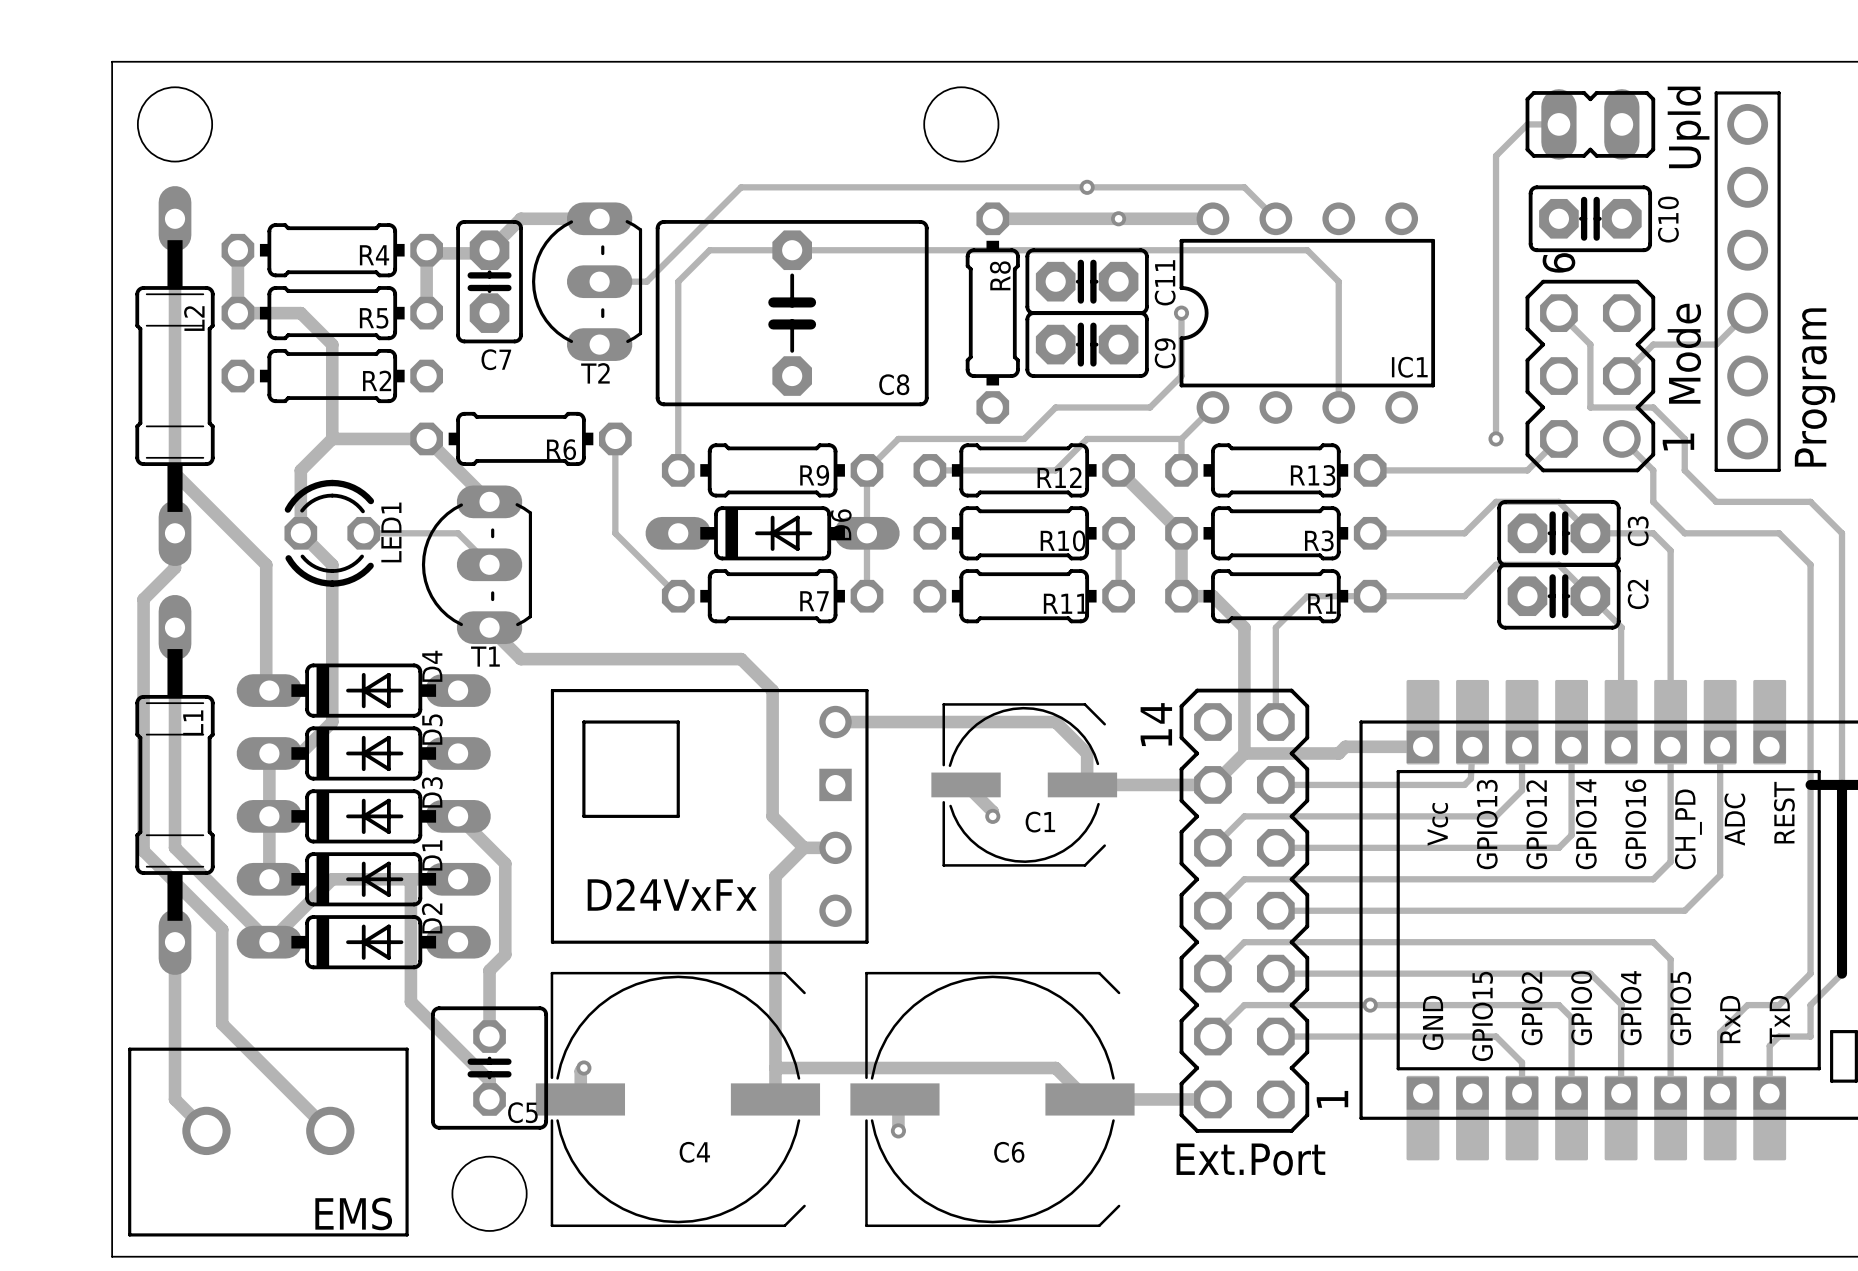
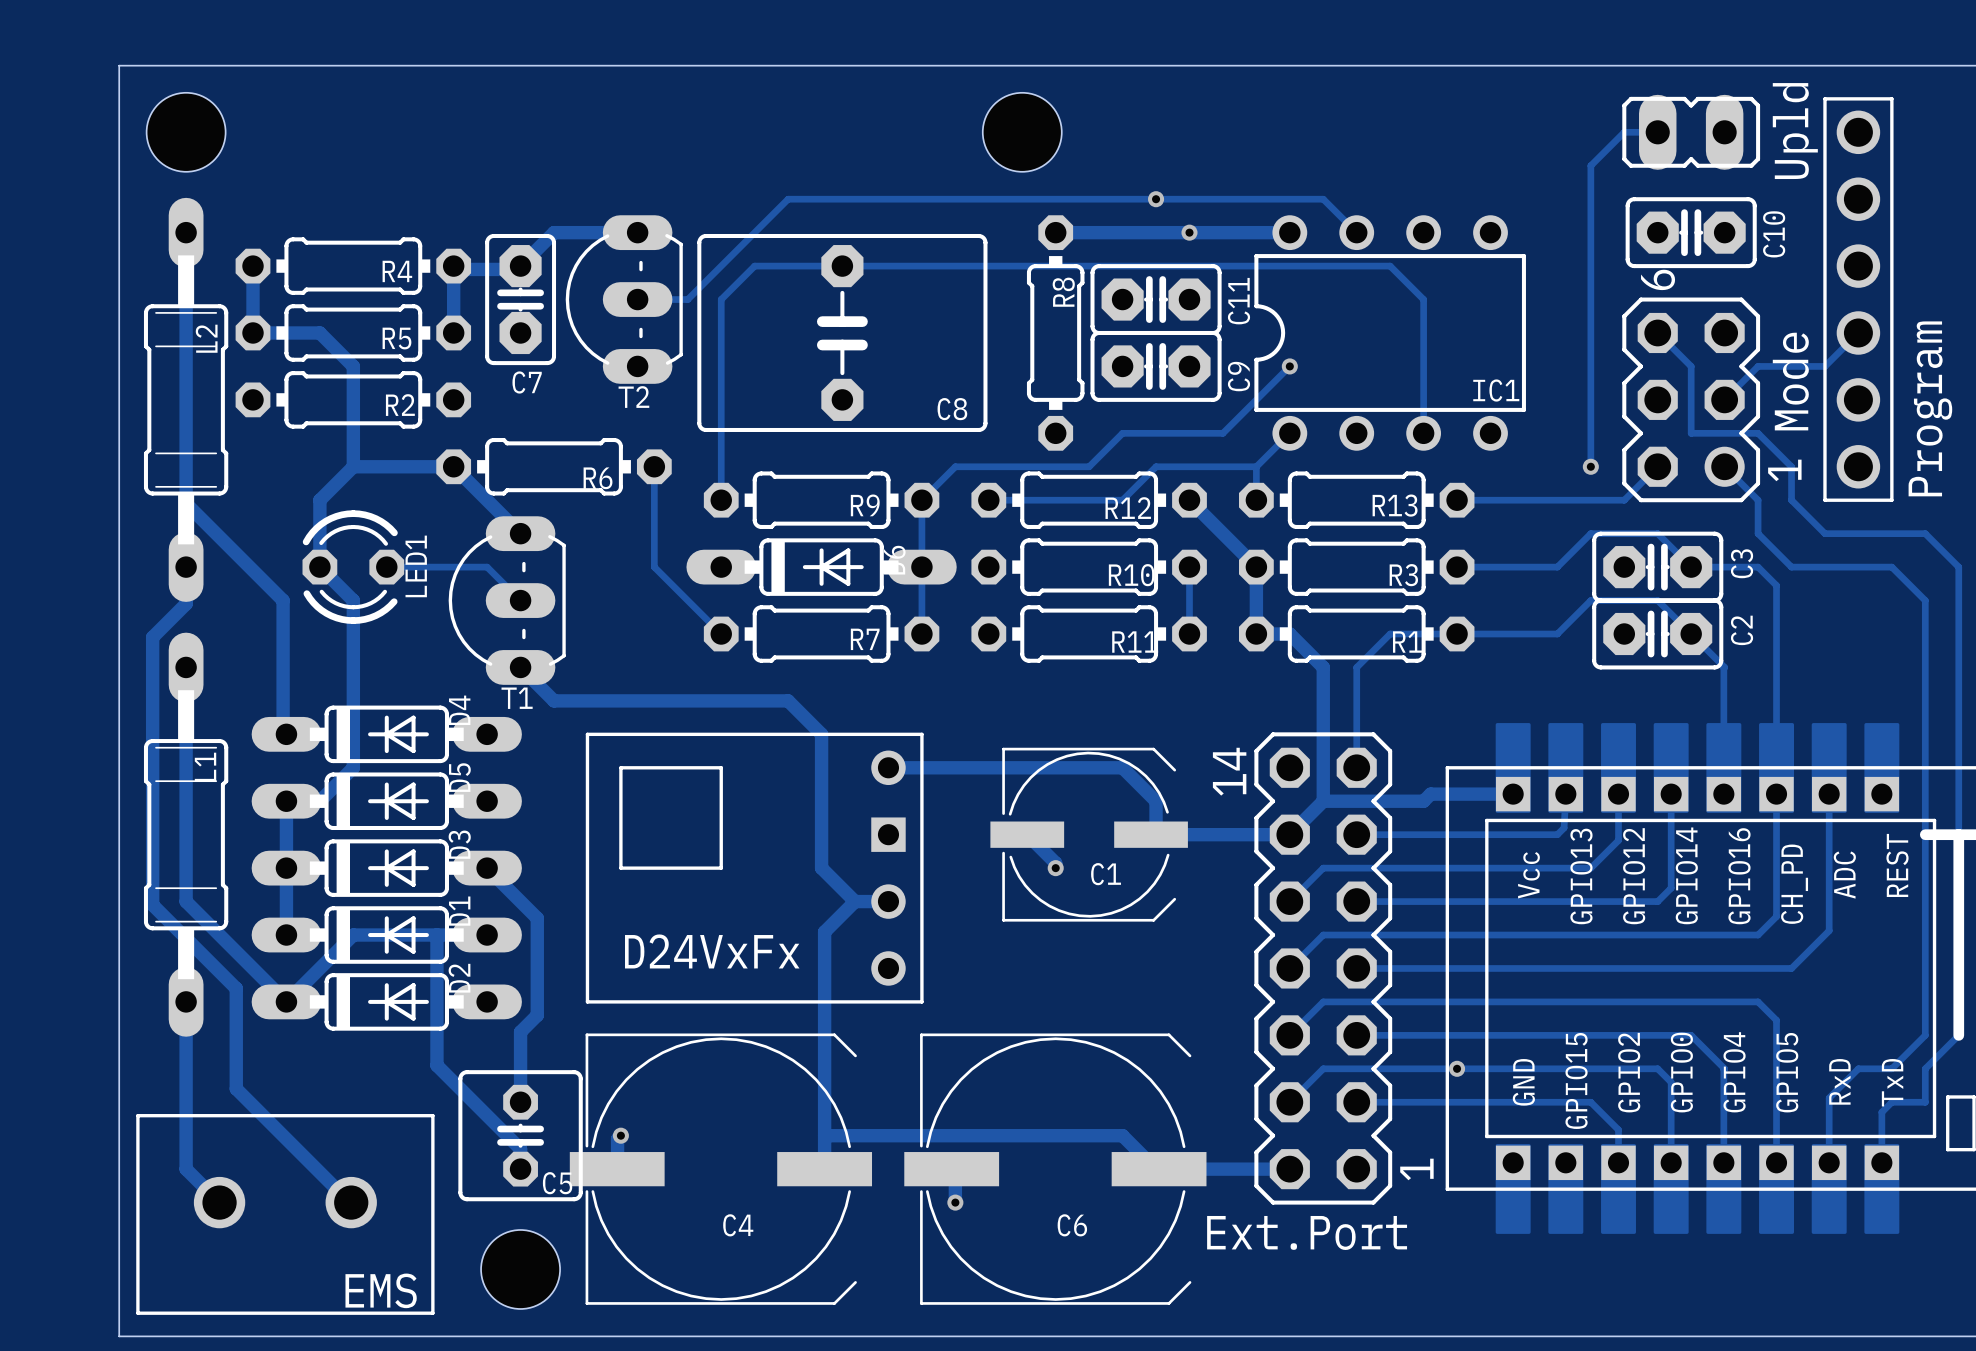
track: (1181, 313) (1181, 376) -> (1289, 366) (1256, 399)
via position: (1181, 313) -> (1289, 366)

